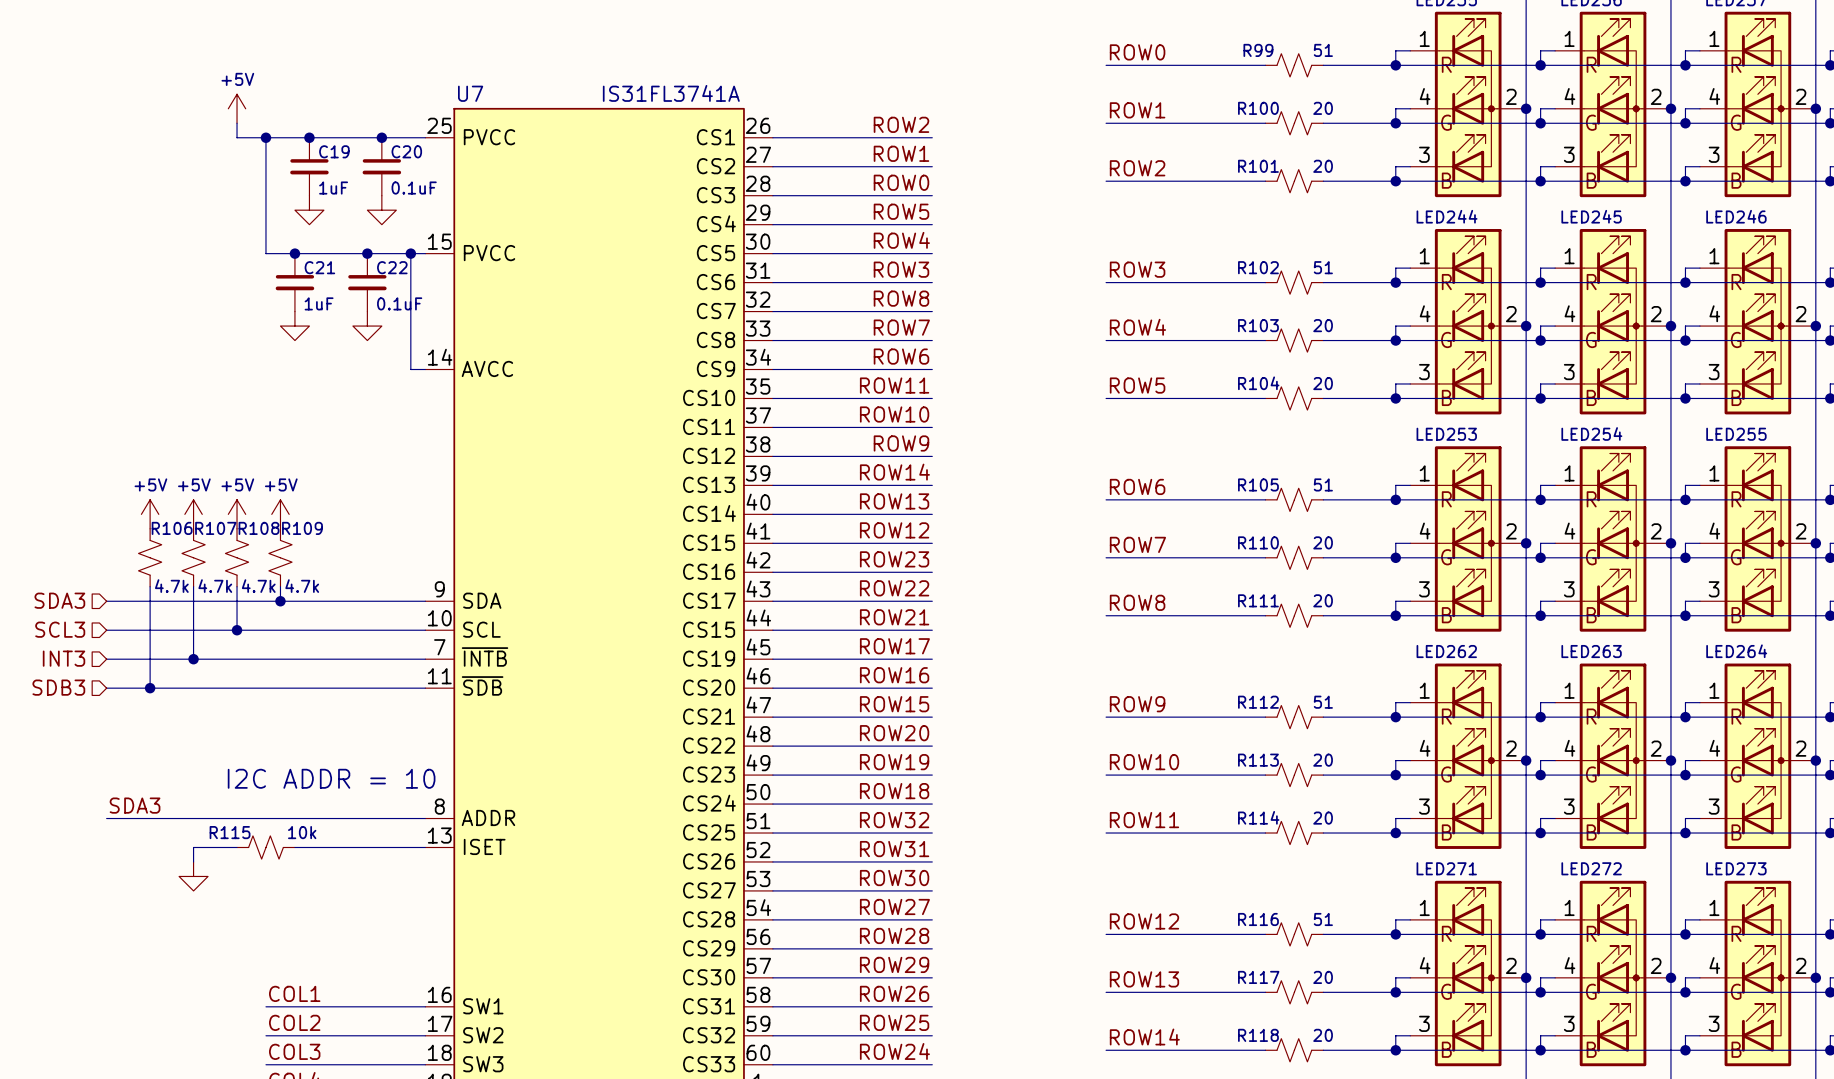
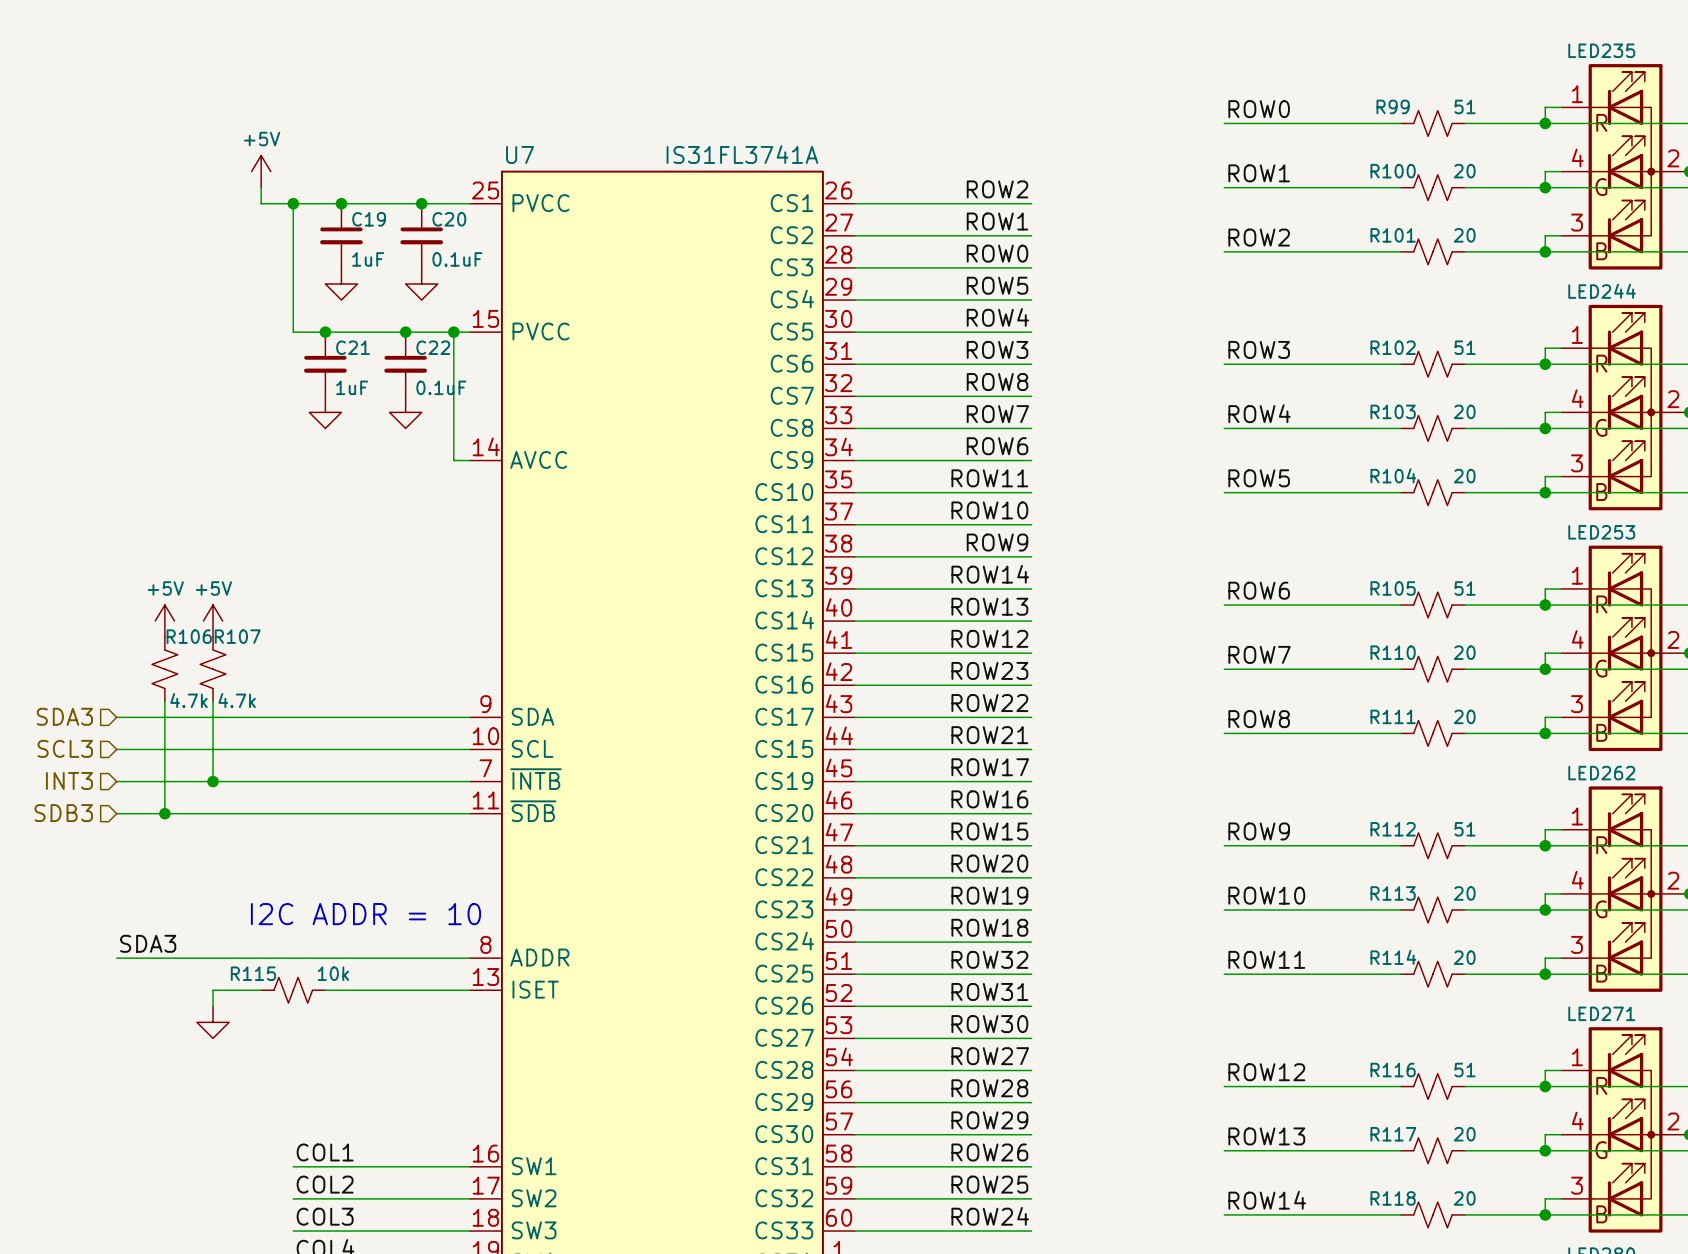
power symbol: +5V (237, 514) -> none
power symbol: +5V (280, 514) -> none
R108: 4.7k (237, 557) -> none
R109: 4.7k (280, 557) -> none
wire: (237, 586) (237, 630) -> none
wire: (280, 586) (280, 601) -> none
junction: (280, 601) -> none
junction: (237, 630) -> none

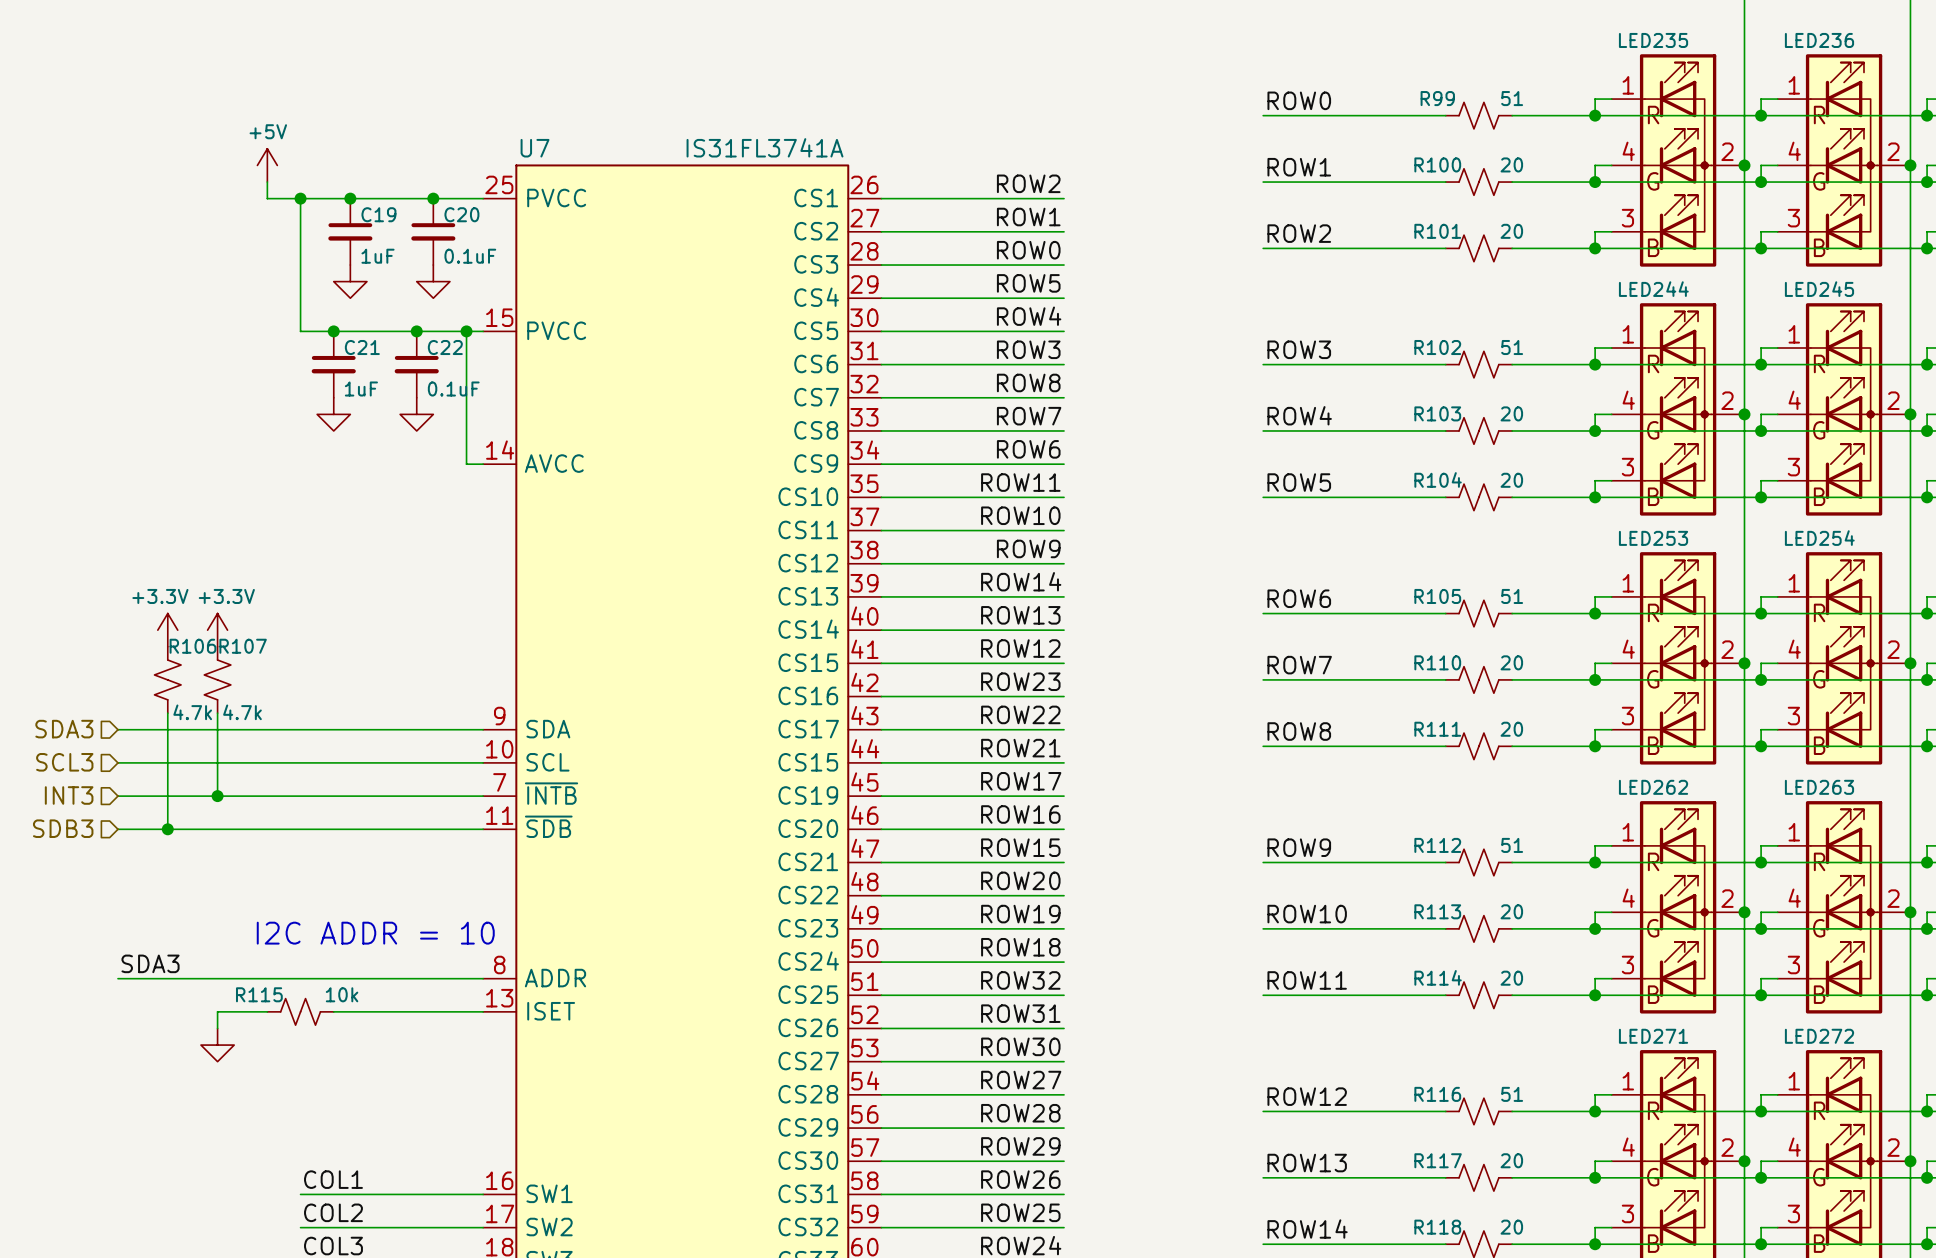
power symbol: +5V (164, 621) -> +3.3V (167, 630)
power symbol: +5V (213, 621) -> +3.3V (217, 630)

